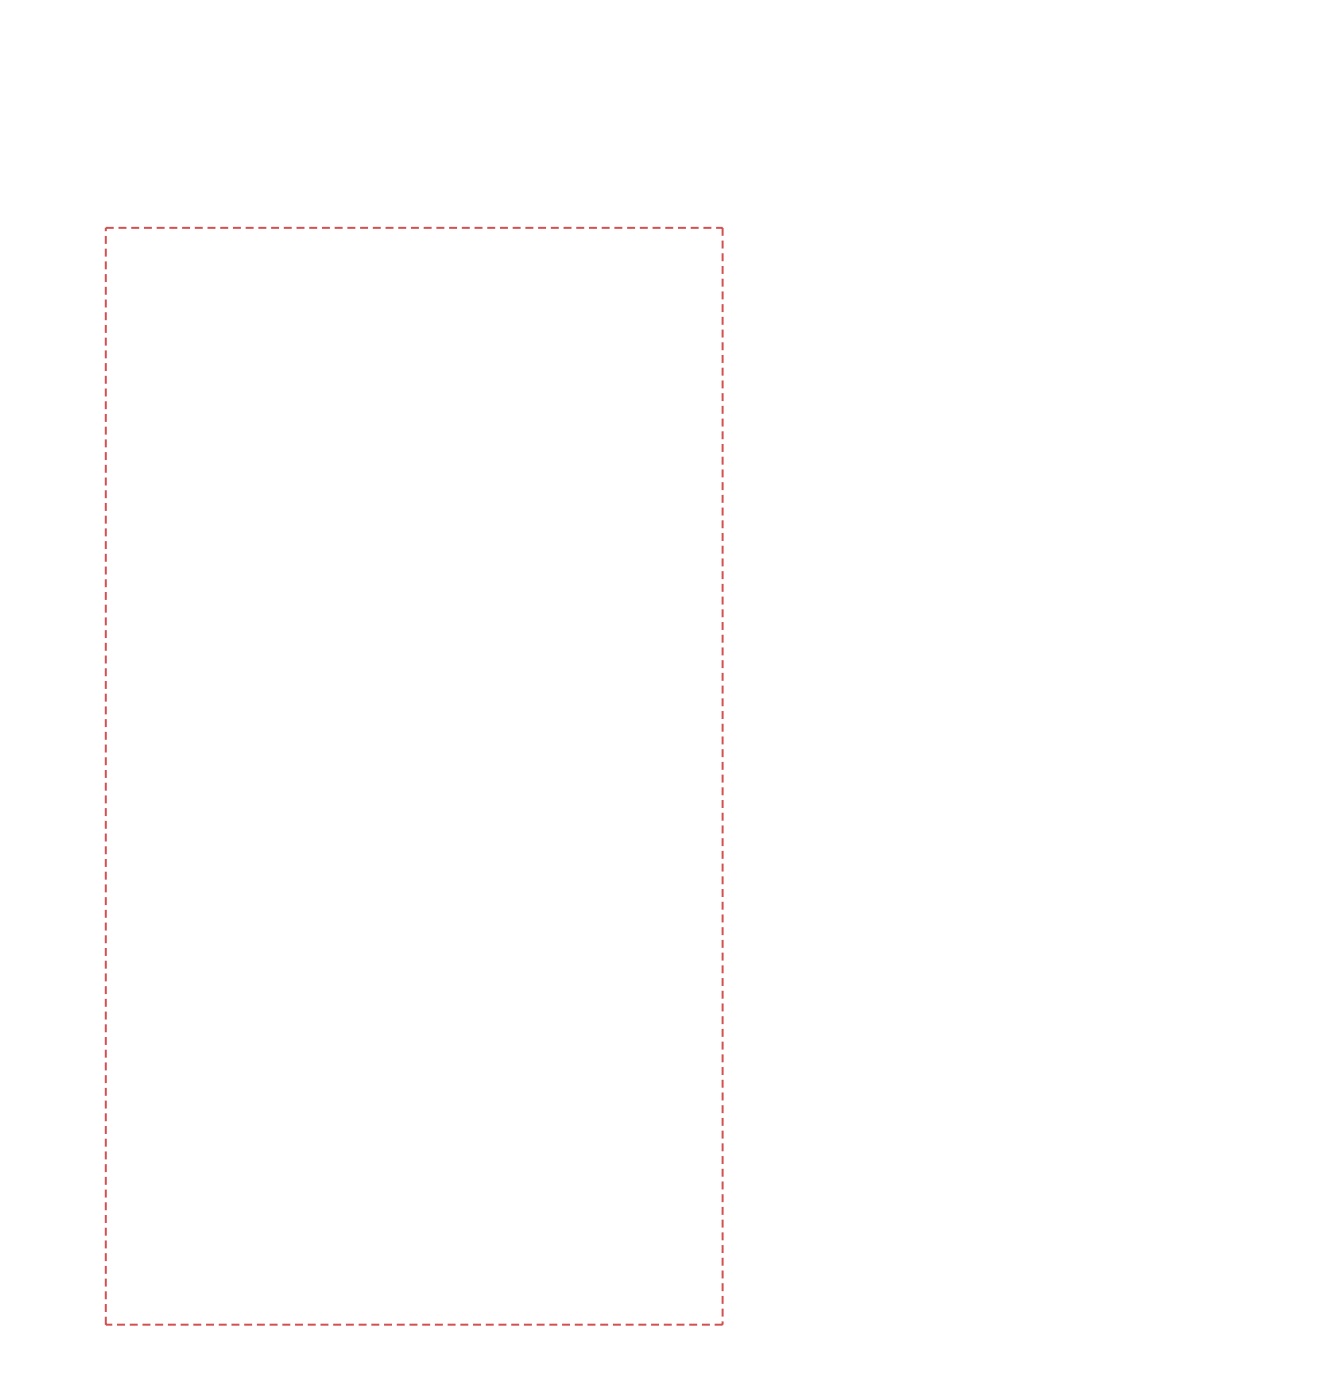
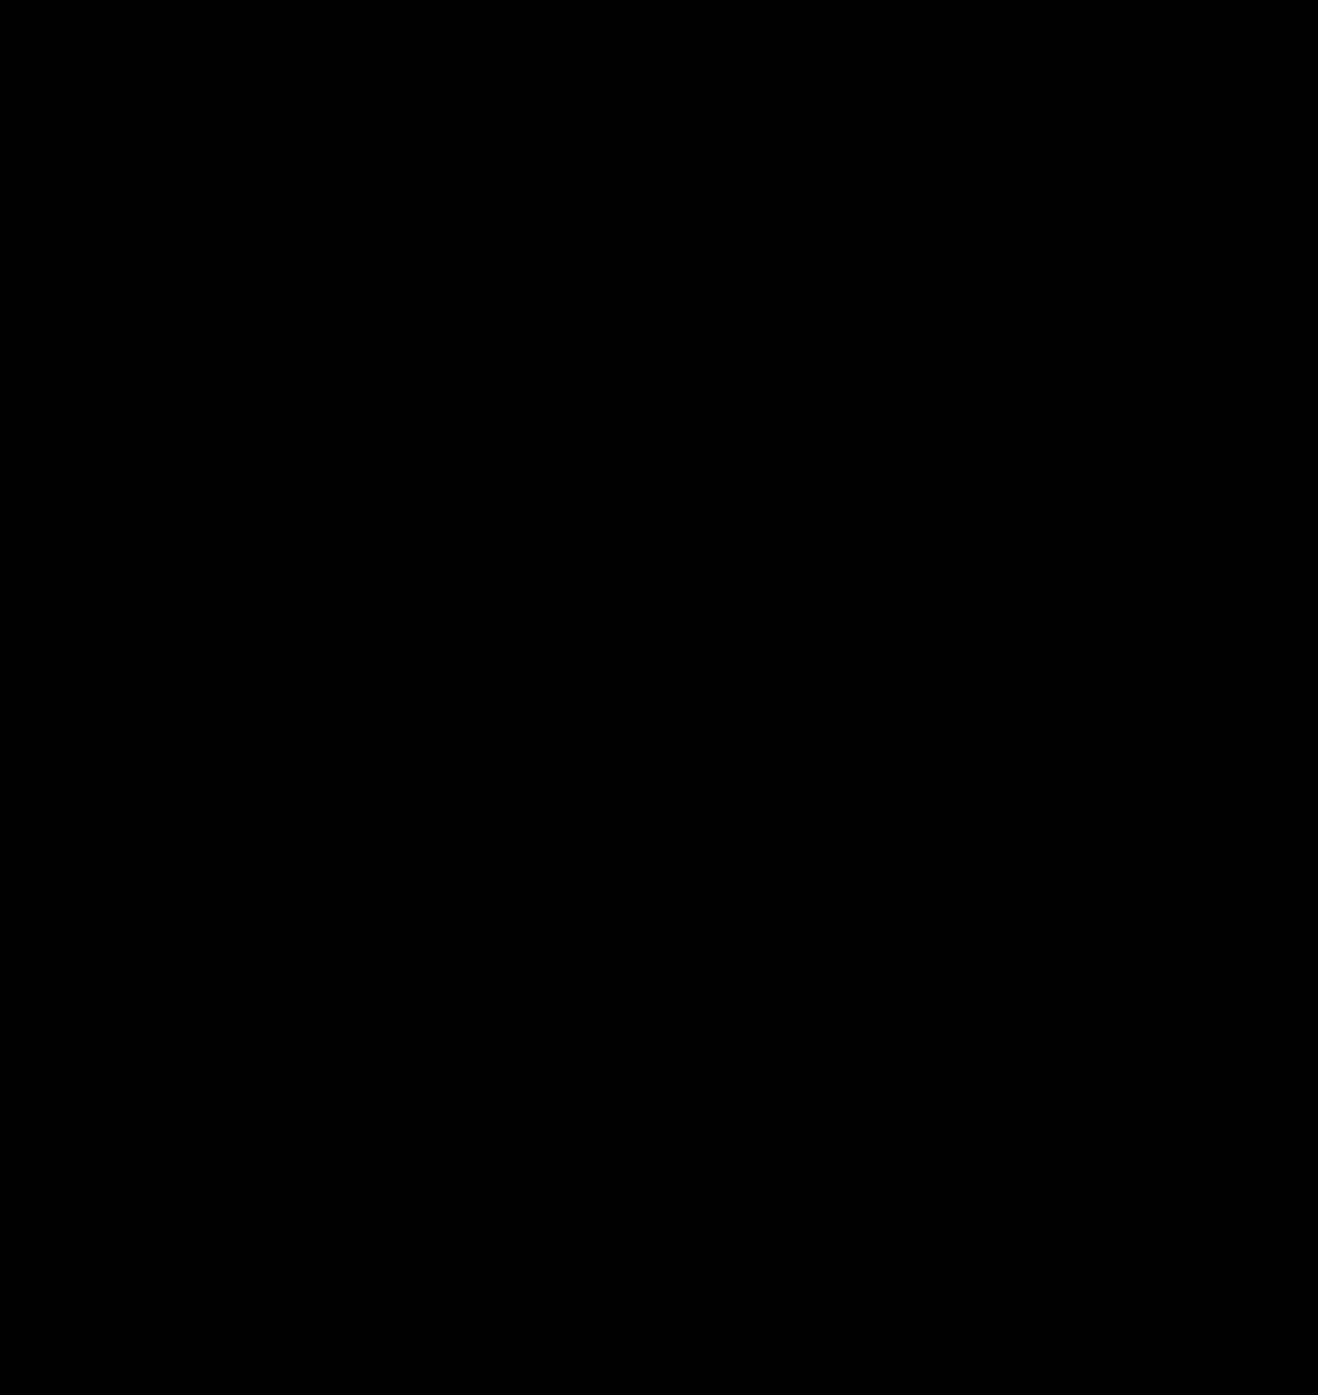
zone outline: (105, 227) (722, 227) (722, 1324) (105, 1324) (105, 227) -> none

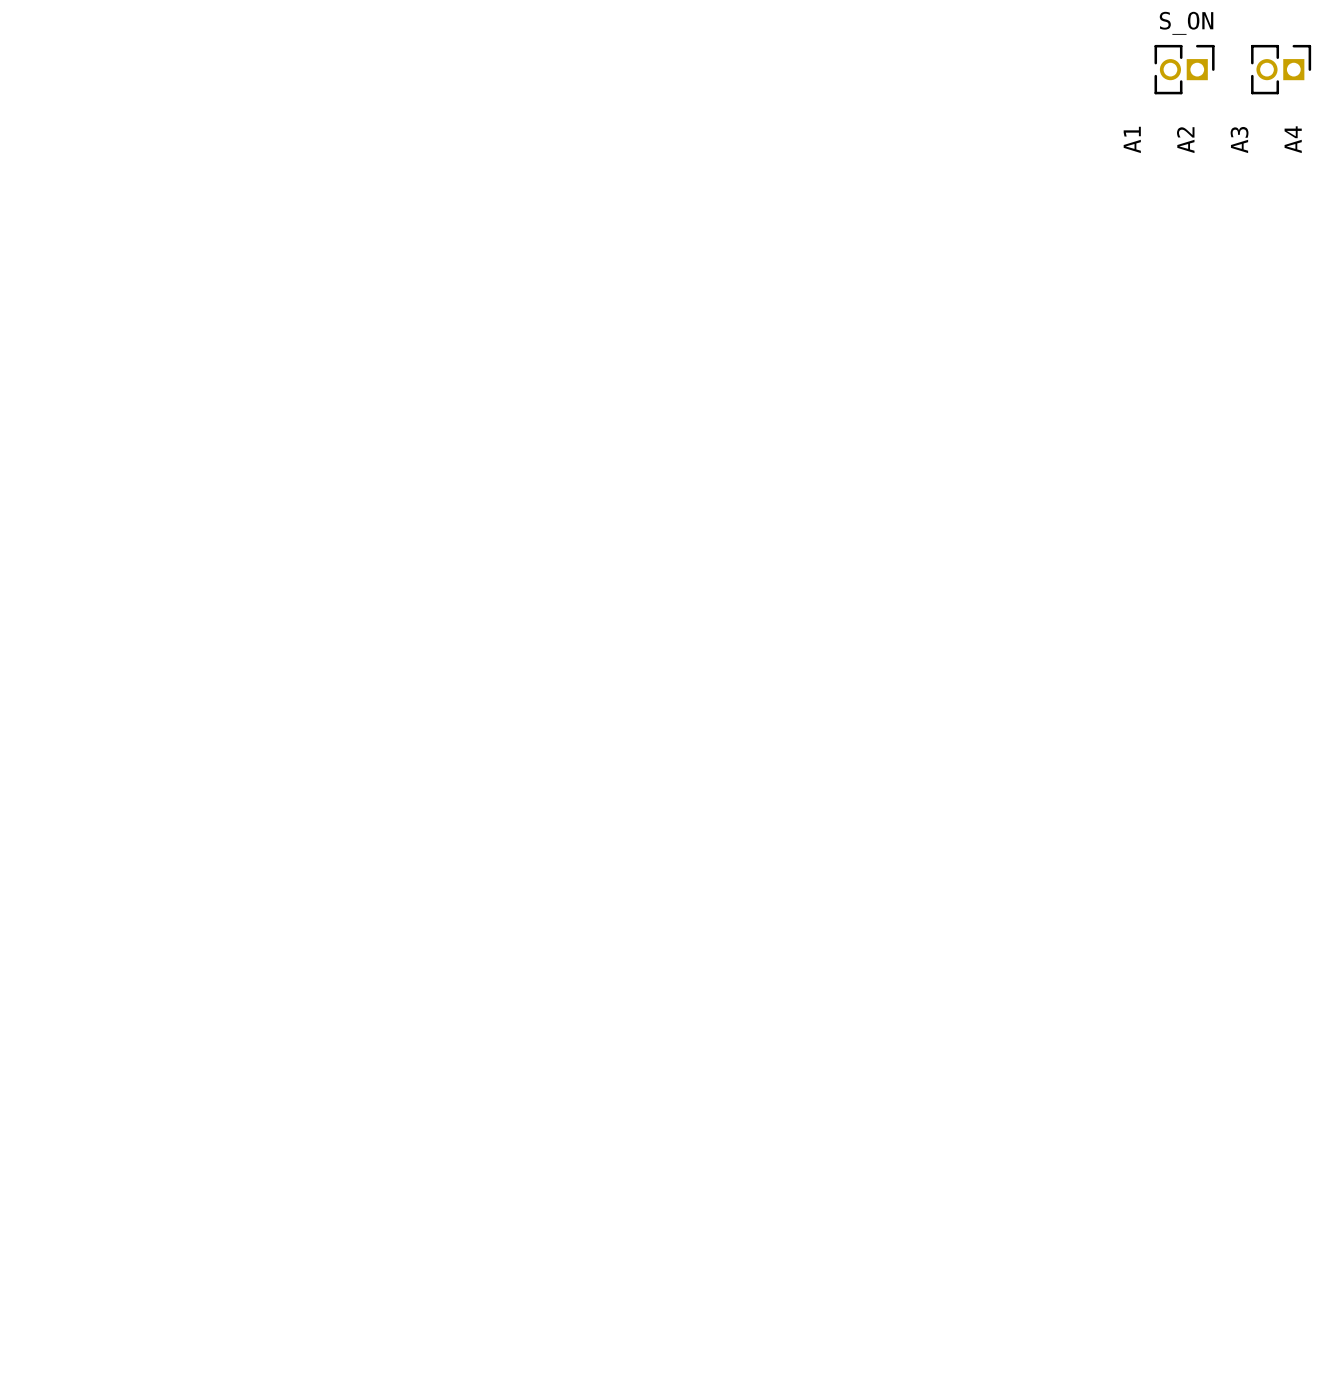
text: none -> S_ON (1186, 23)
part: none -> (1184, 69)
part: none -> (1281, 69)
text: none -> A4 (1293, 139)
text: none -> A1 (1132, 139)
text: none -> A2 (1185, 140)
text: none -> A3 (1239, 140)

